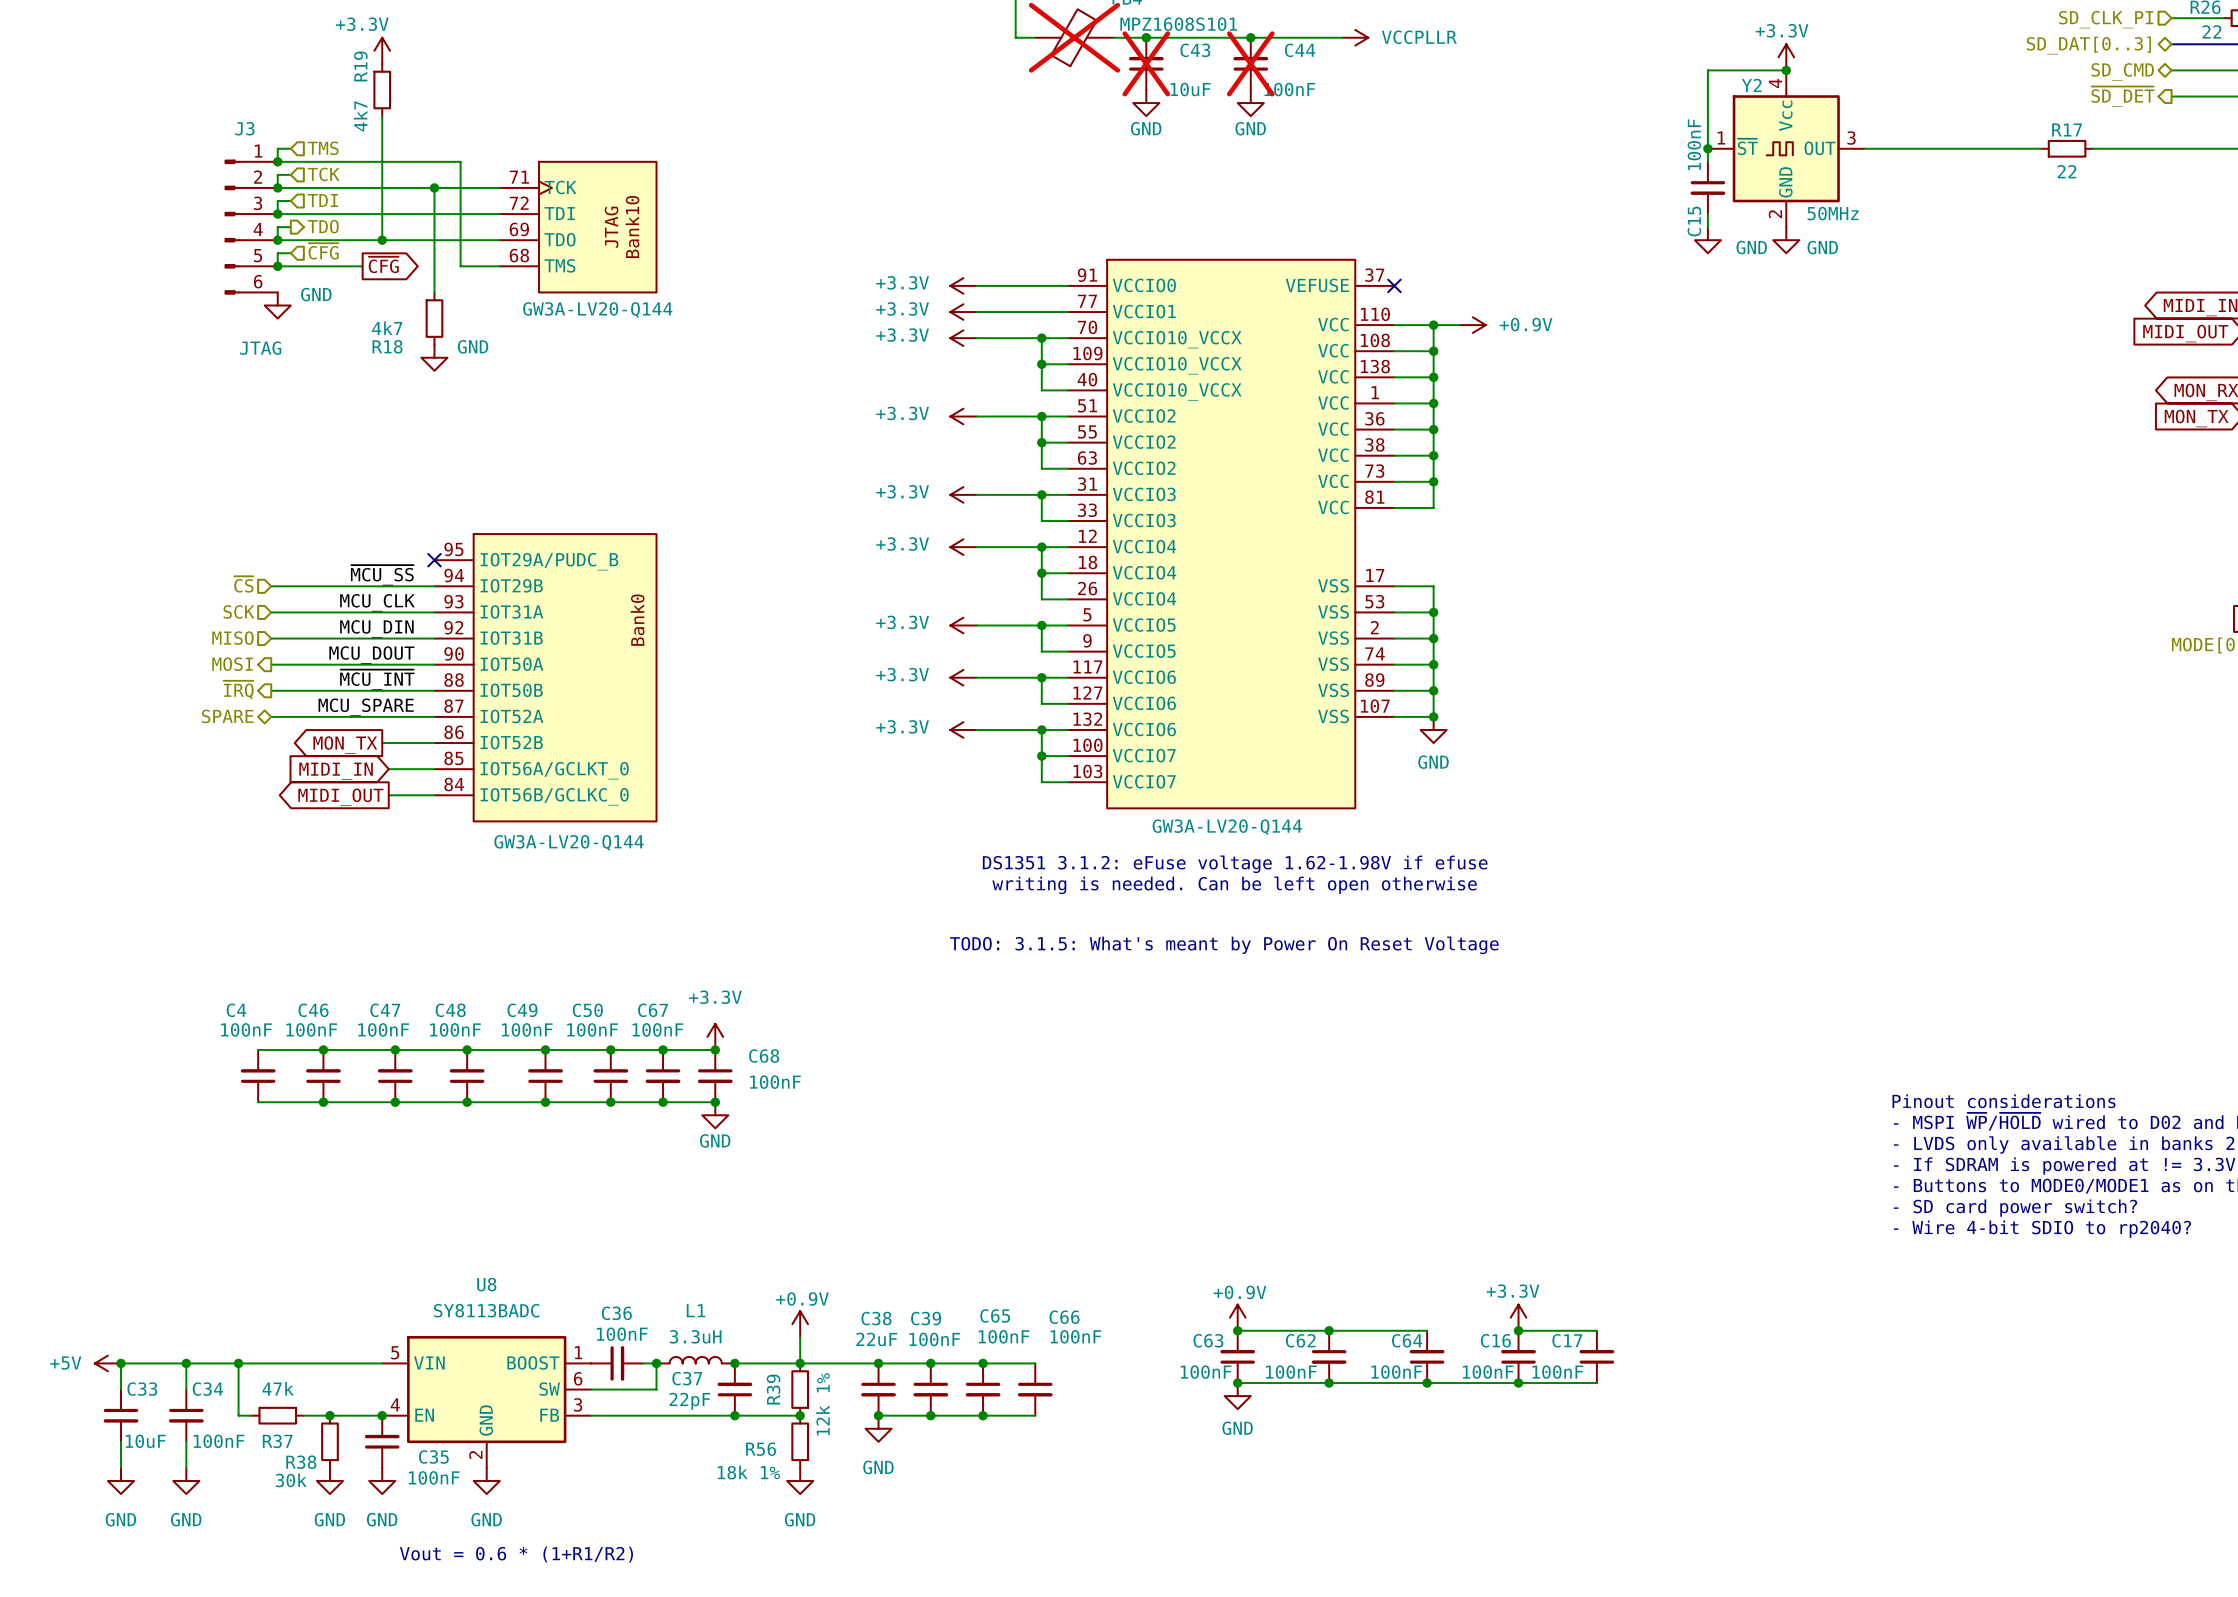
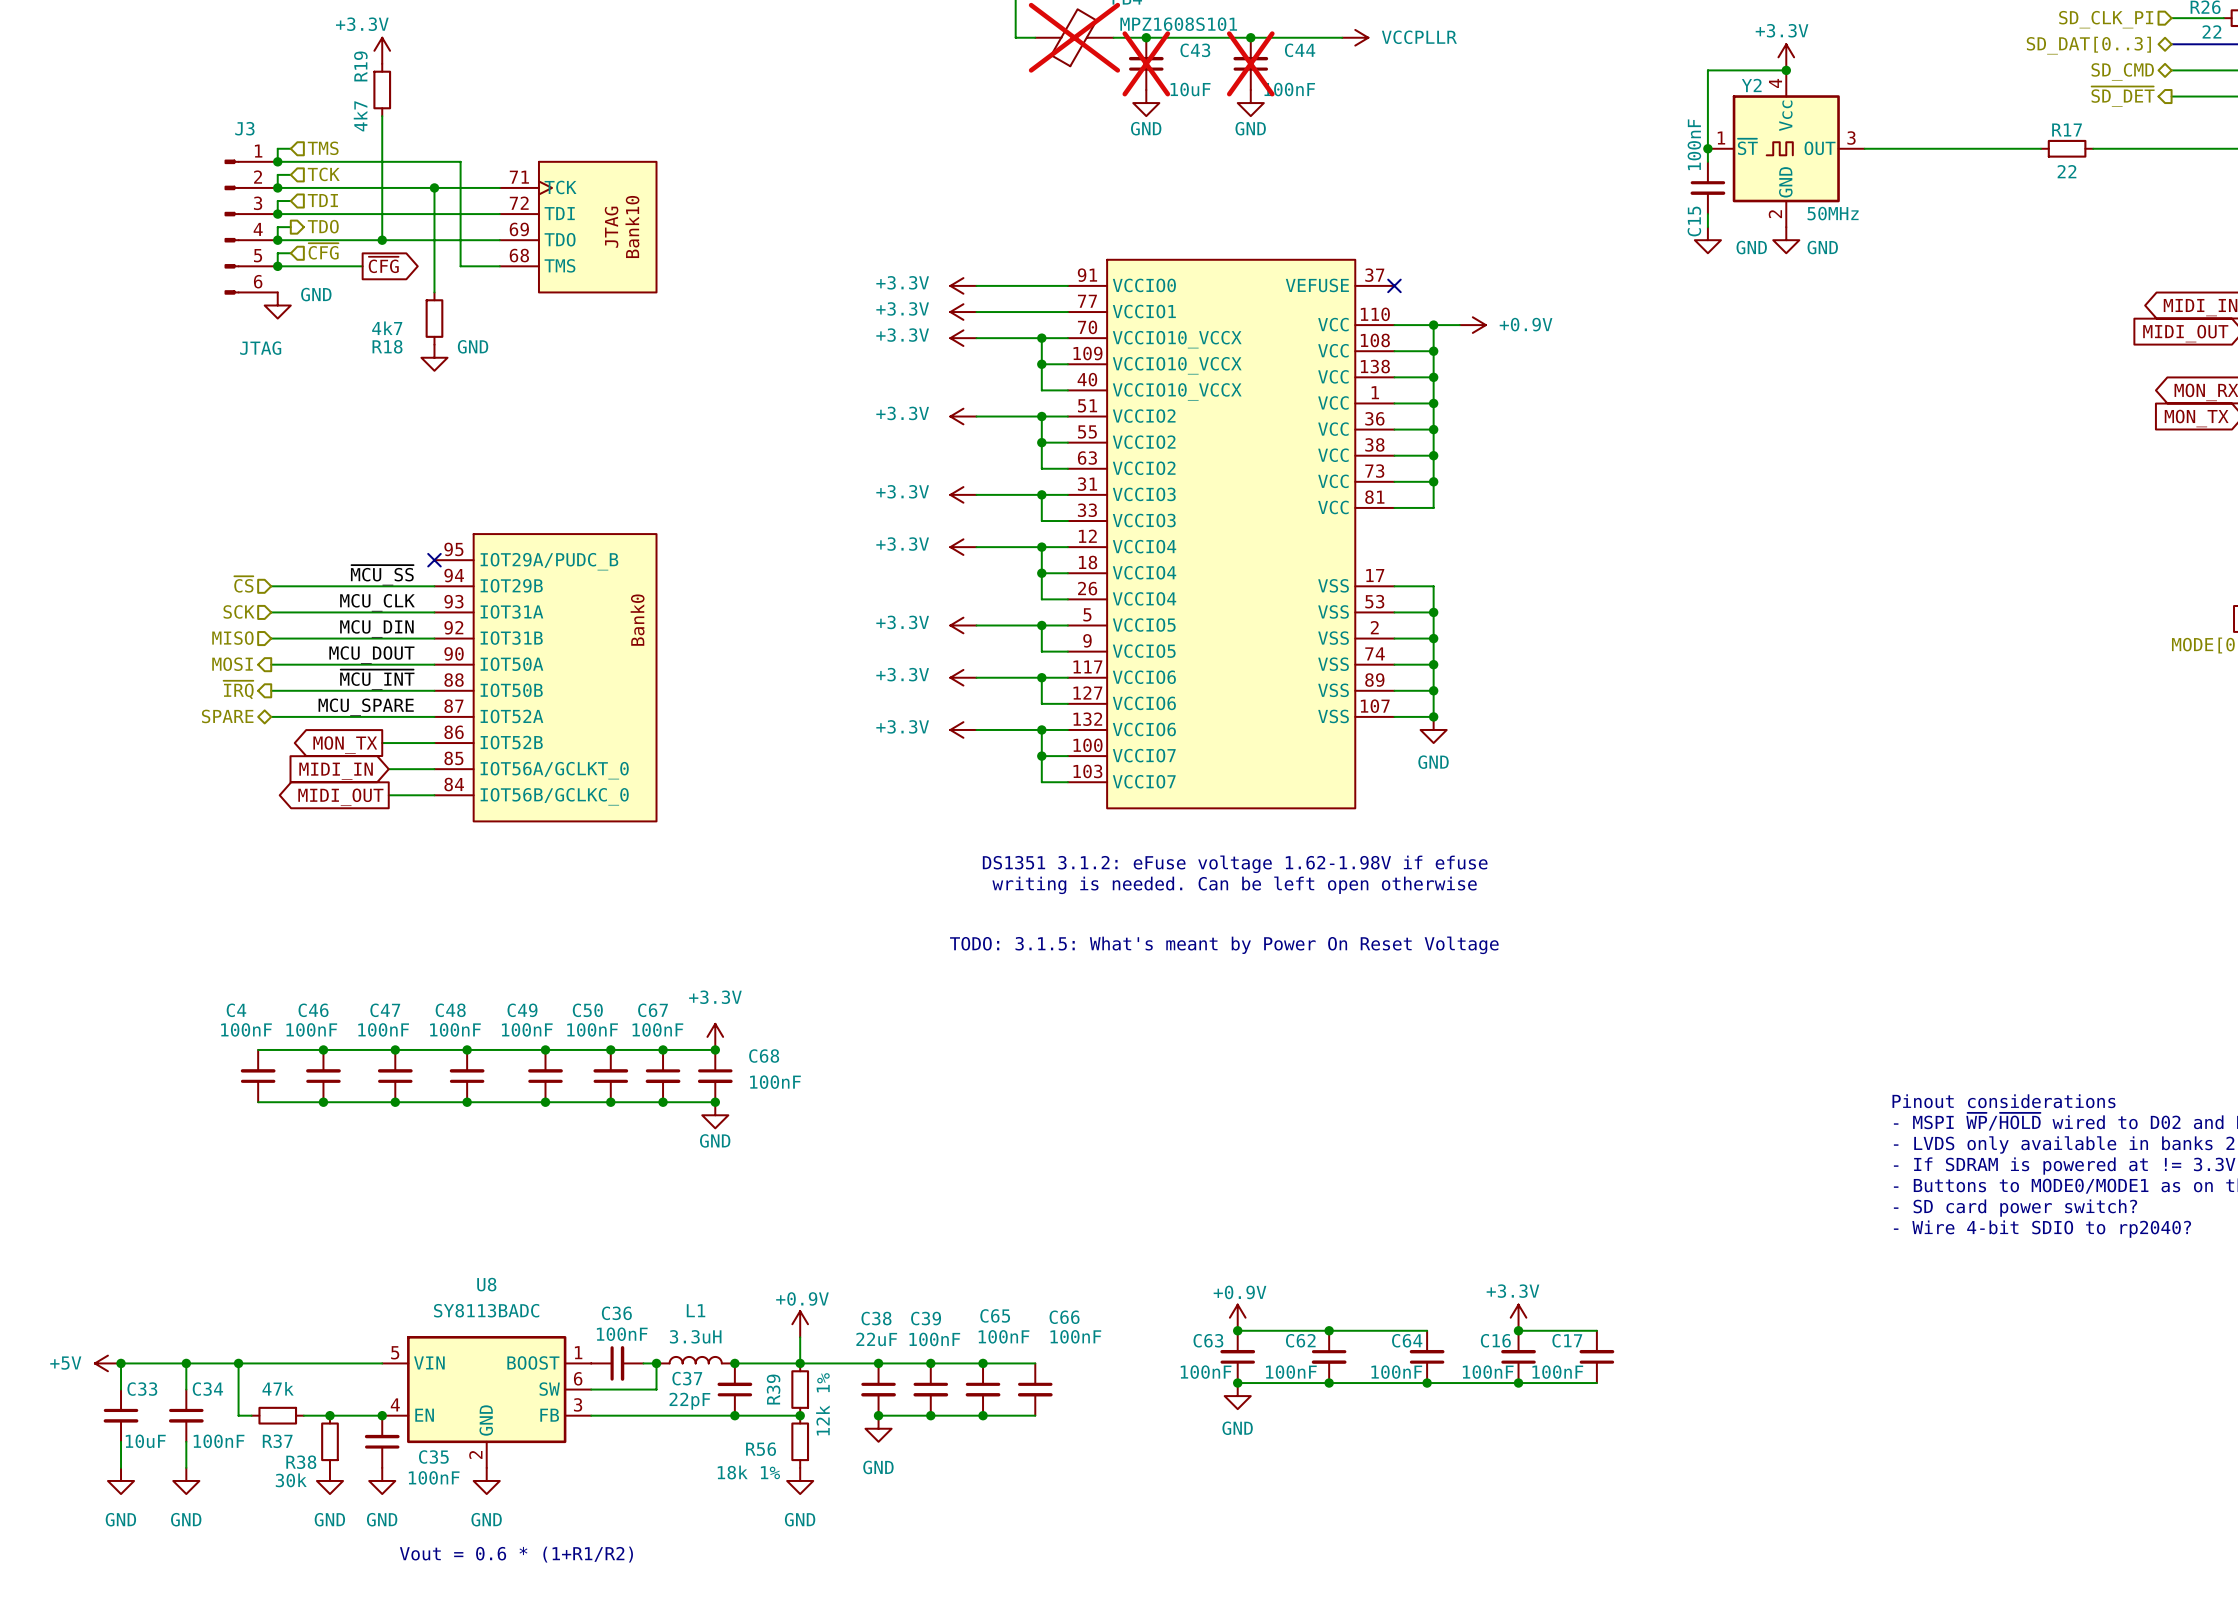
part value: GW3A-LV20-Q144 (597, 309) -> none
part value: GW3A-LV20-Q144 (1227, 827) -> none
part value: GW3A-LV20-Q144 (569, 842) -> none

